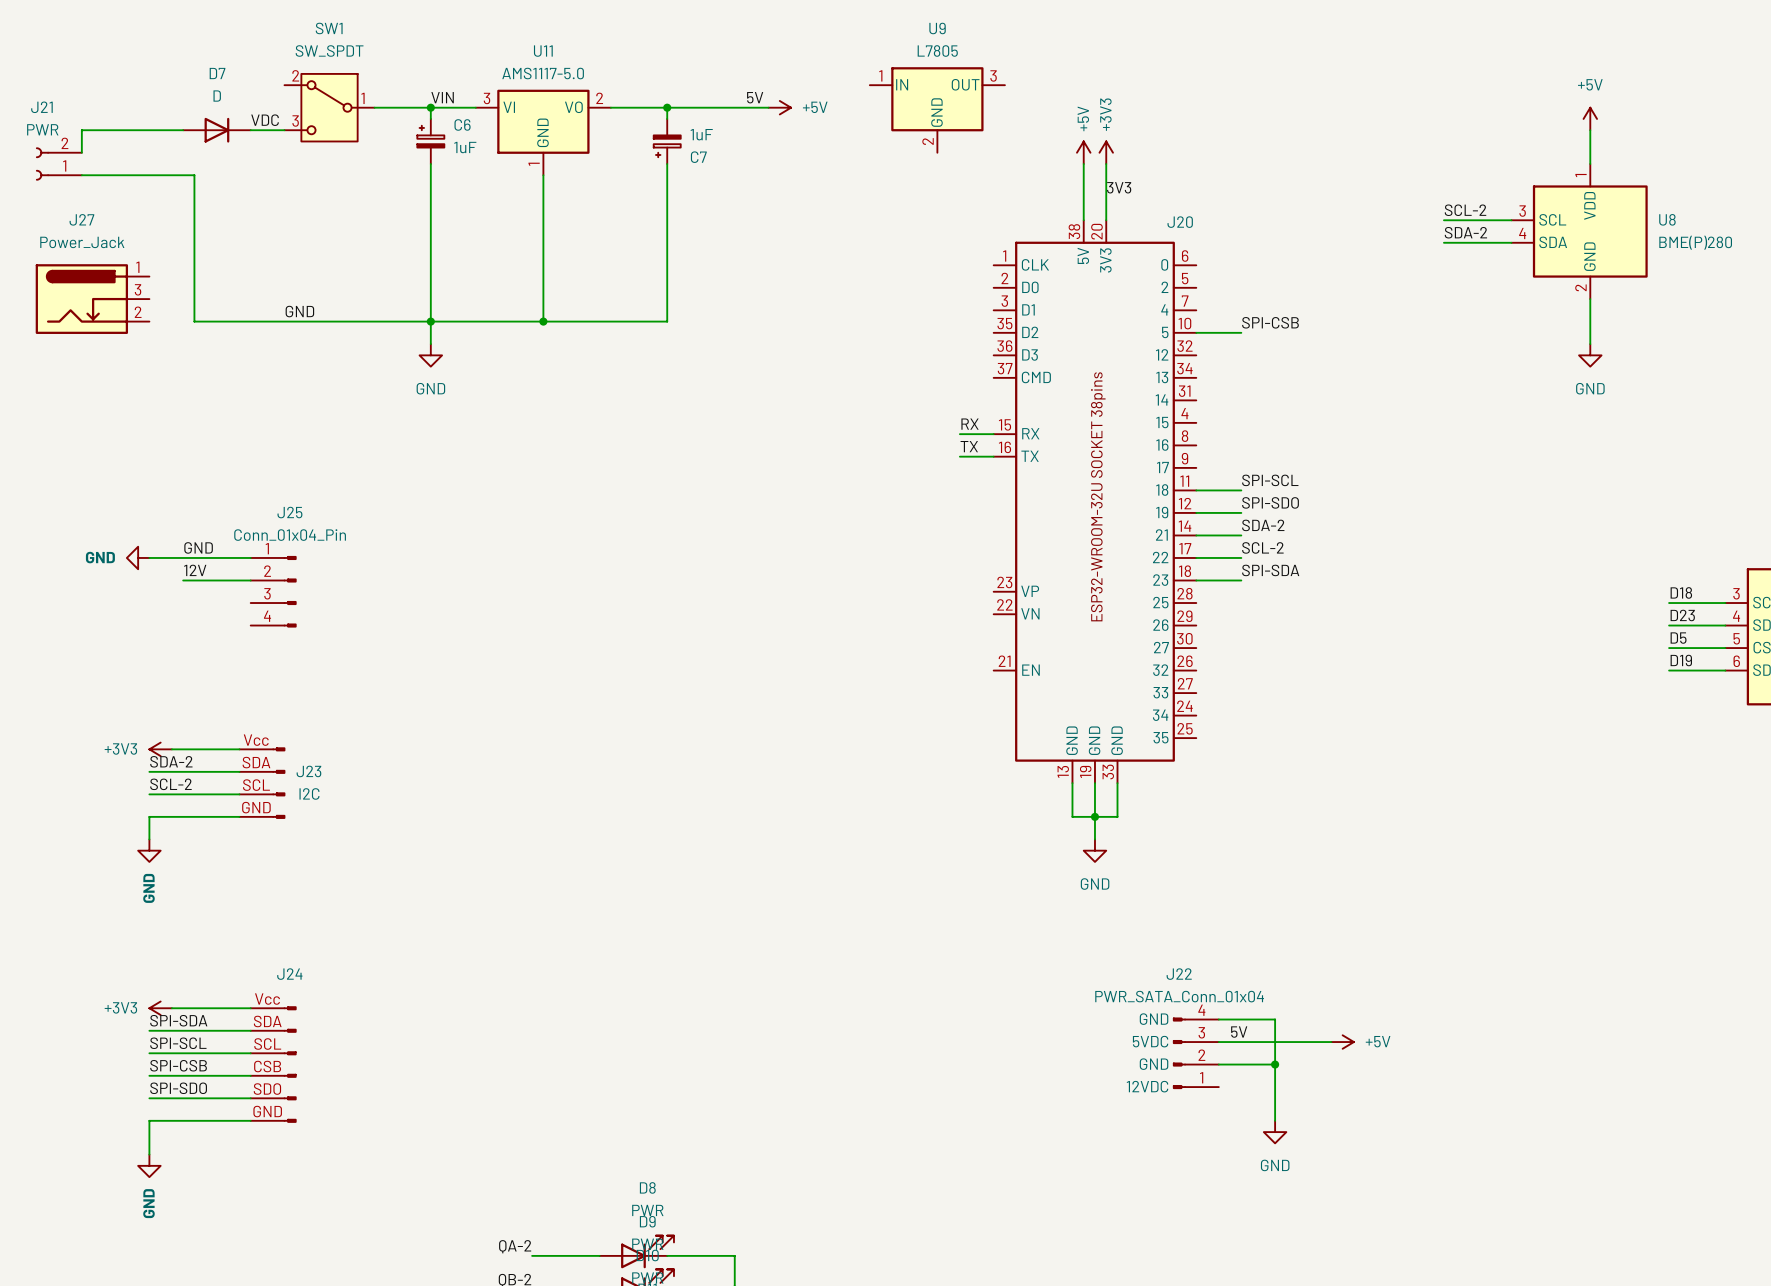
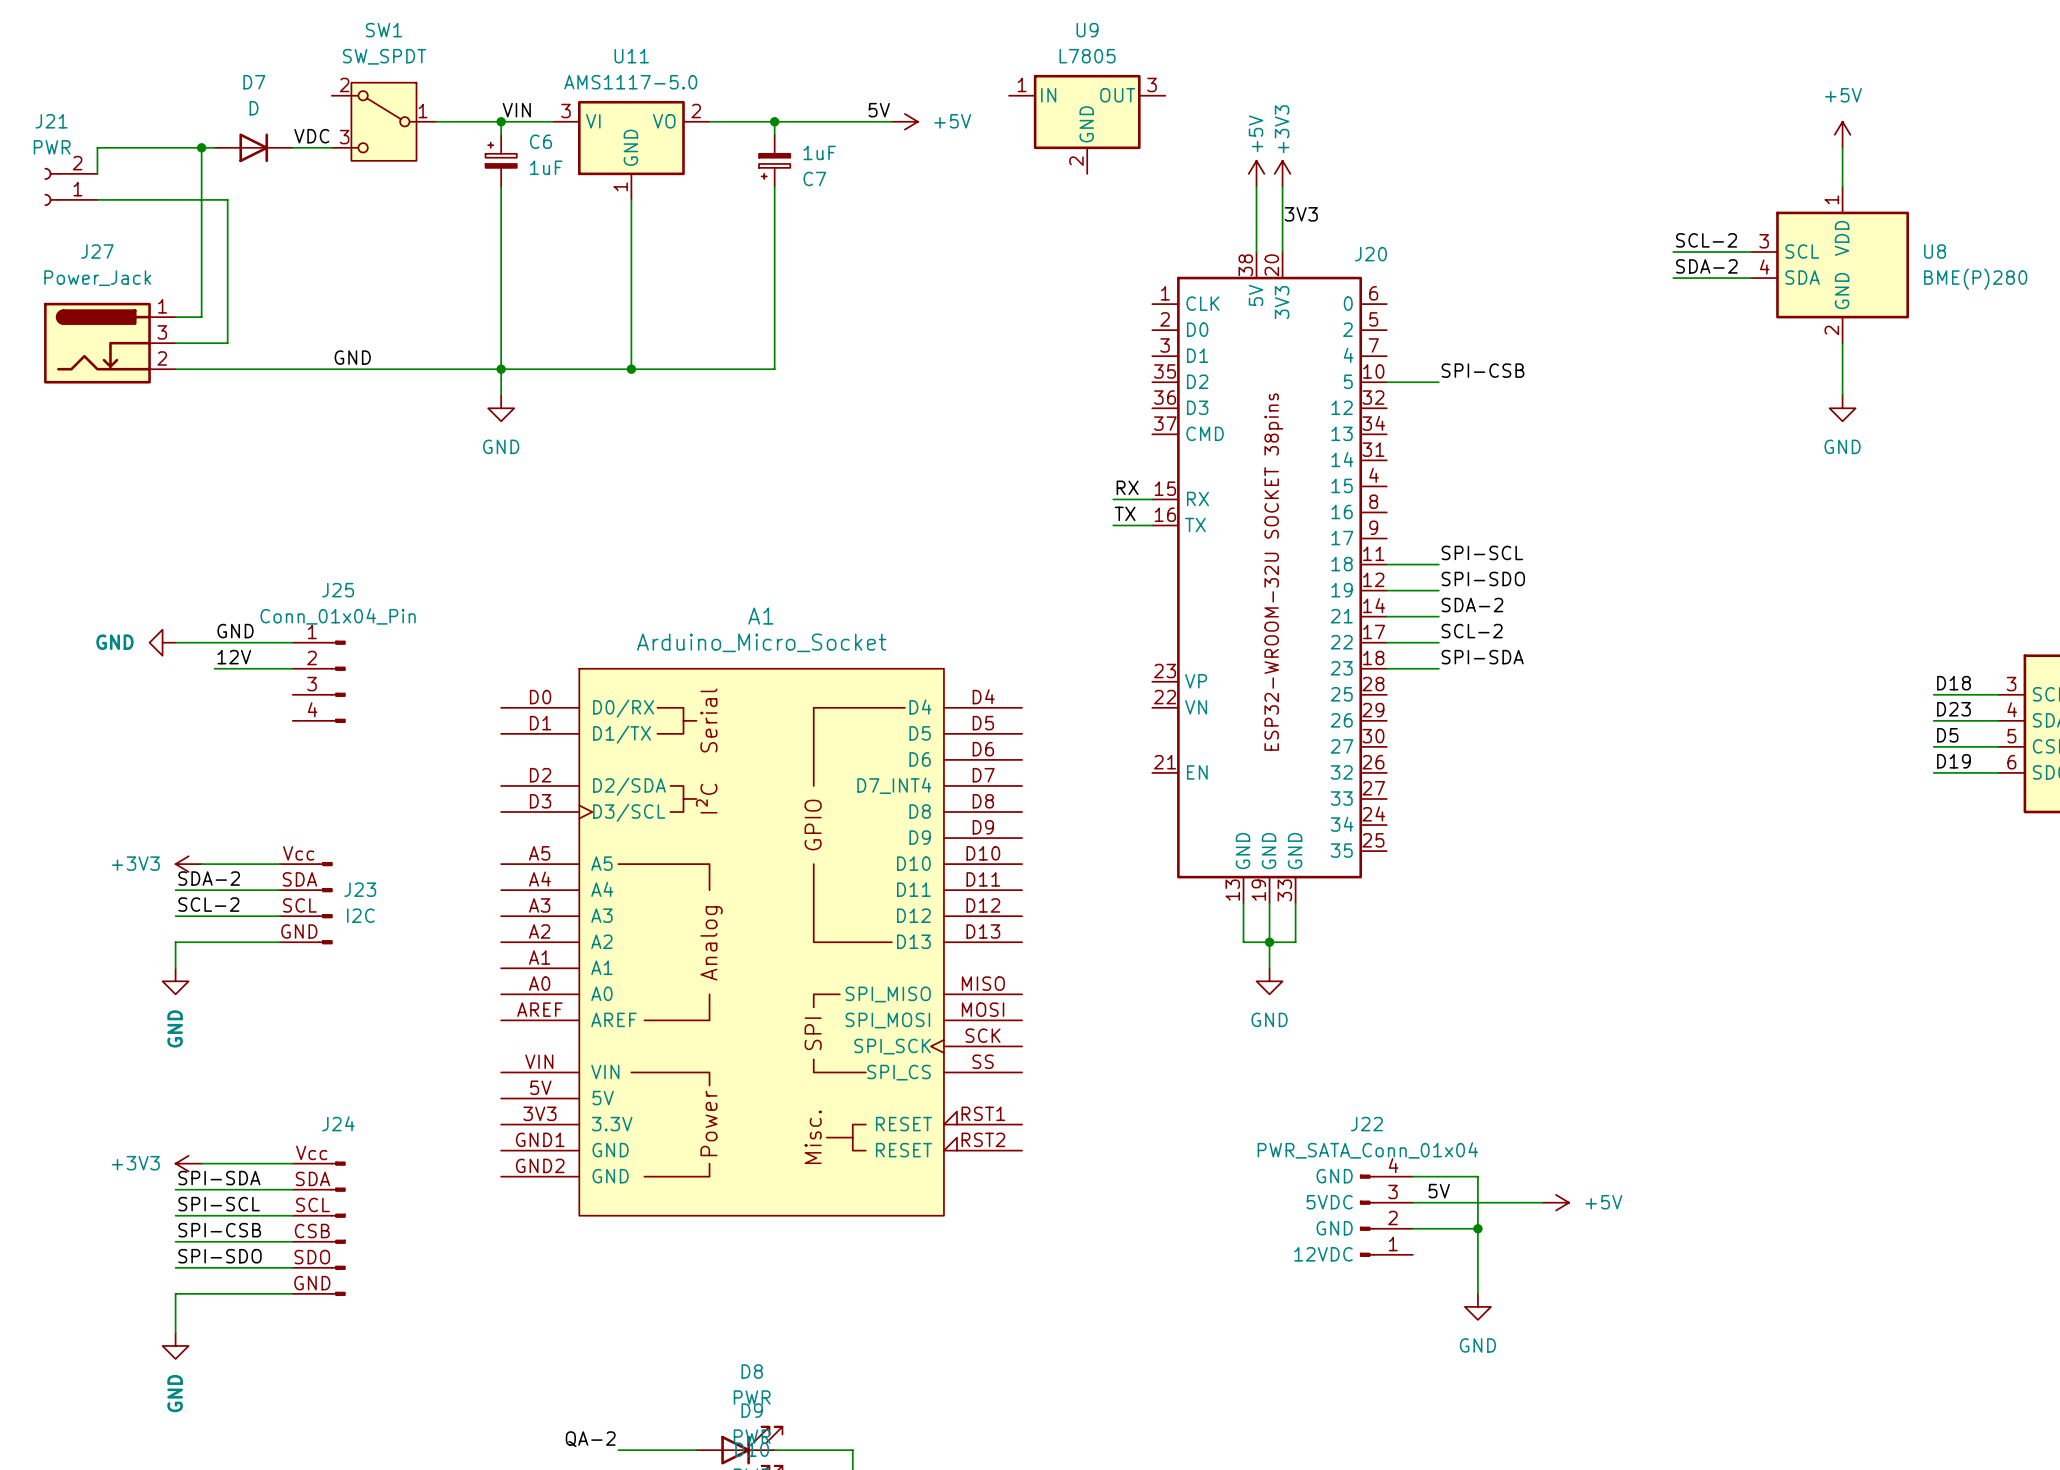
wire: none -> (201, 147) (201, 317) (175, 317)
junction: none -> (201, 147)
wire: (194, 299) (194, 321) -> (227, 343) (175, 343)
wire: none -> (175, 369) (227, 369)
A1: none -> Arduino_Micro_Socket (761, 942)

